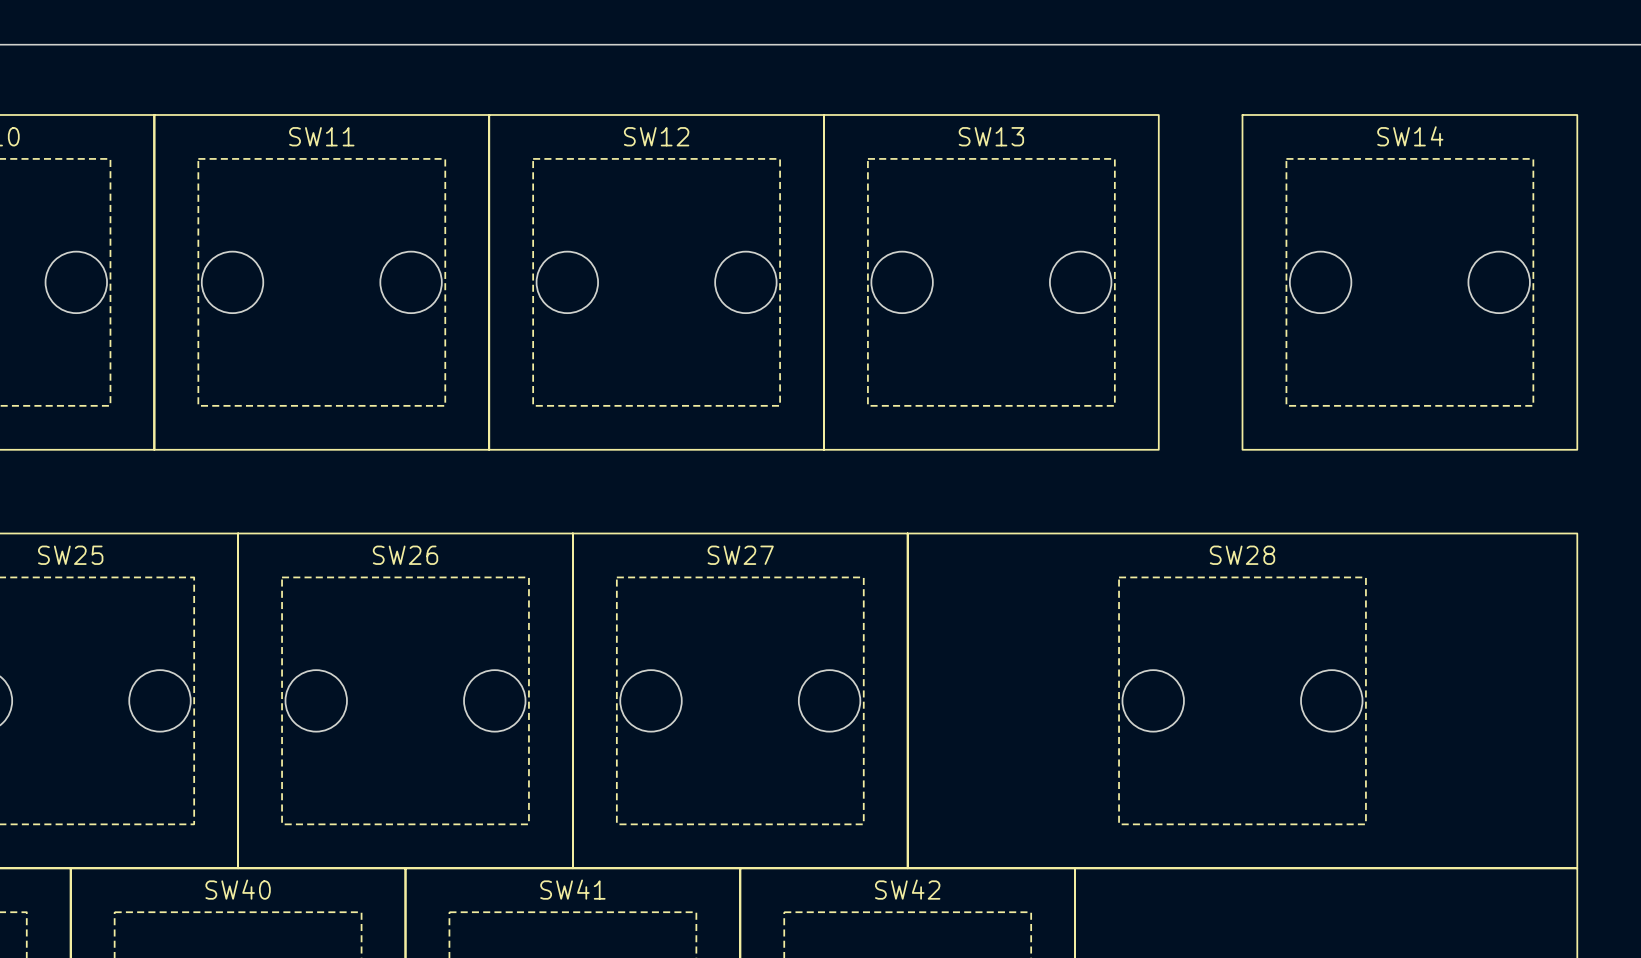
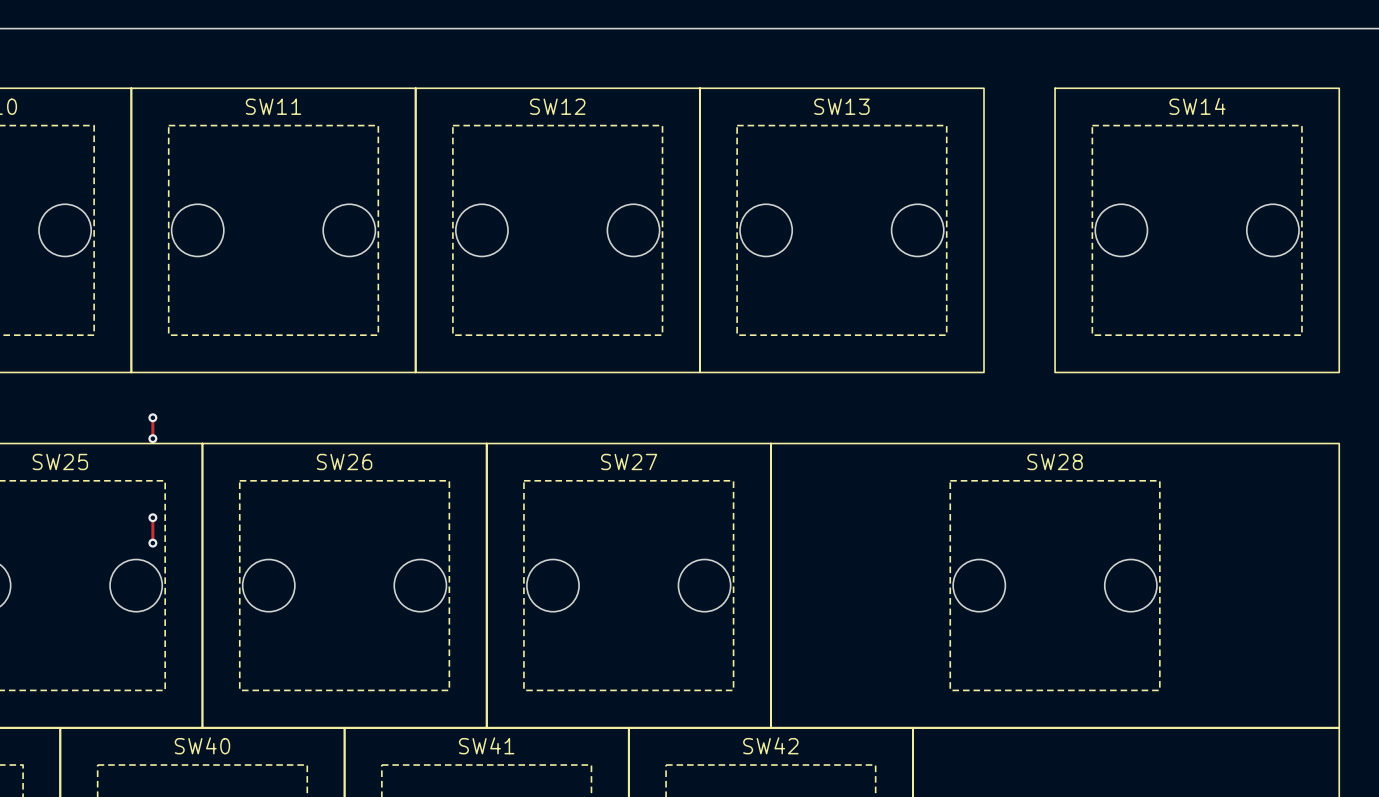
track: none -> (152, 417) (152, 438)
via: none -> (152, 417)
via: none -> (152, 438)
track: none -> (152, 517) (152, 543)
via: none -> (152, 517)
via: none -> (152, 543)

